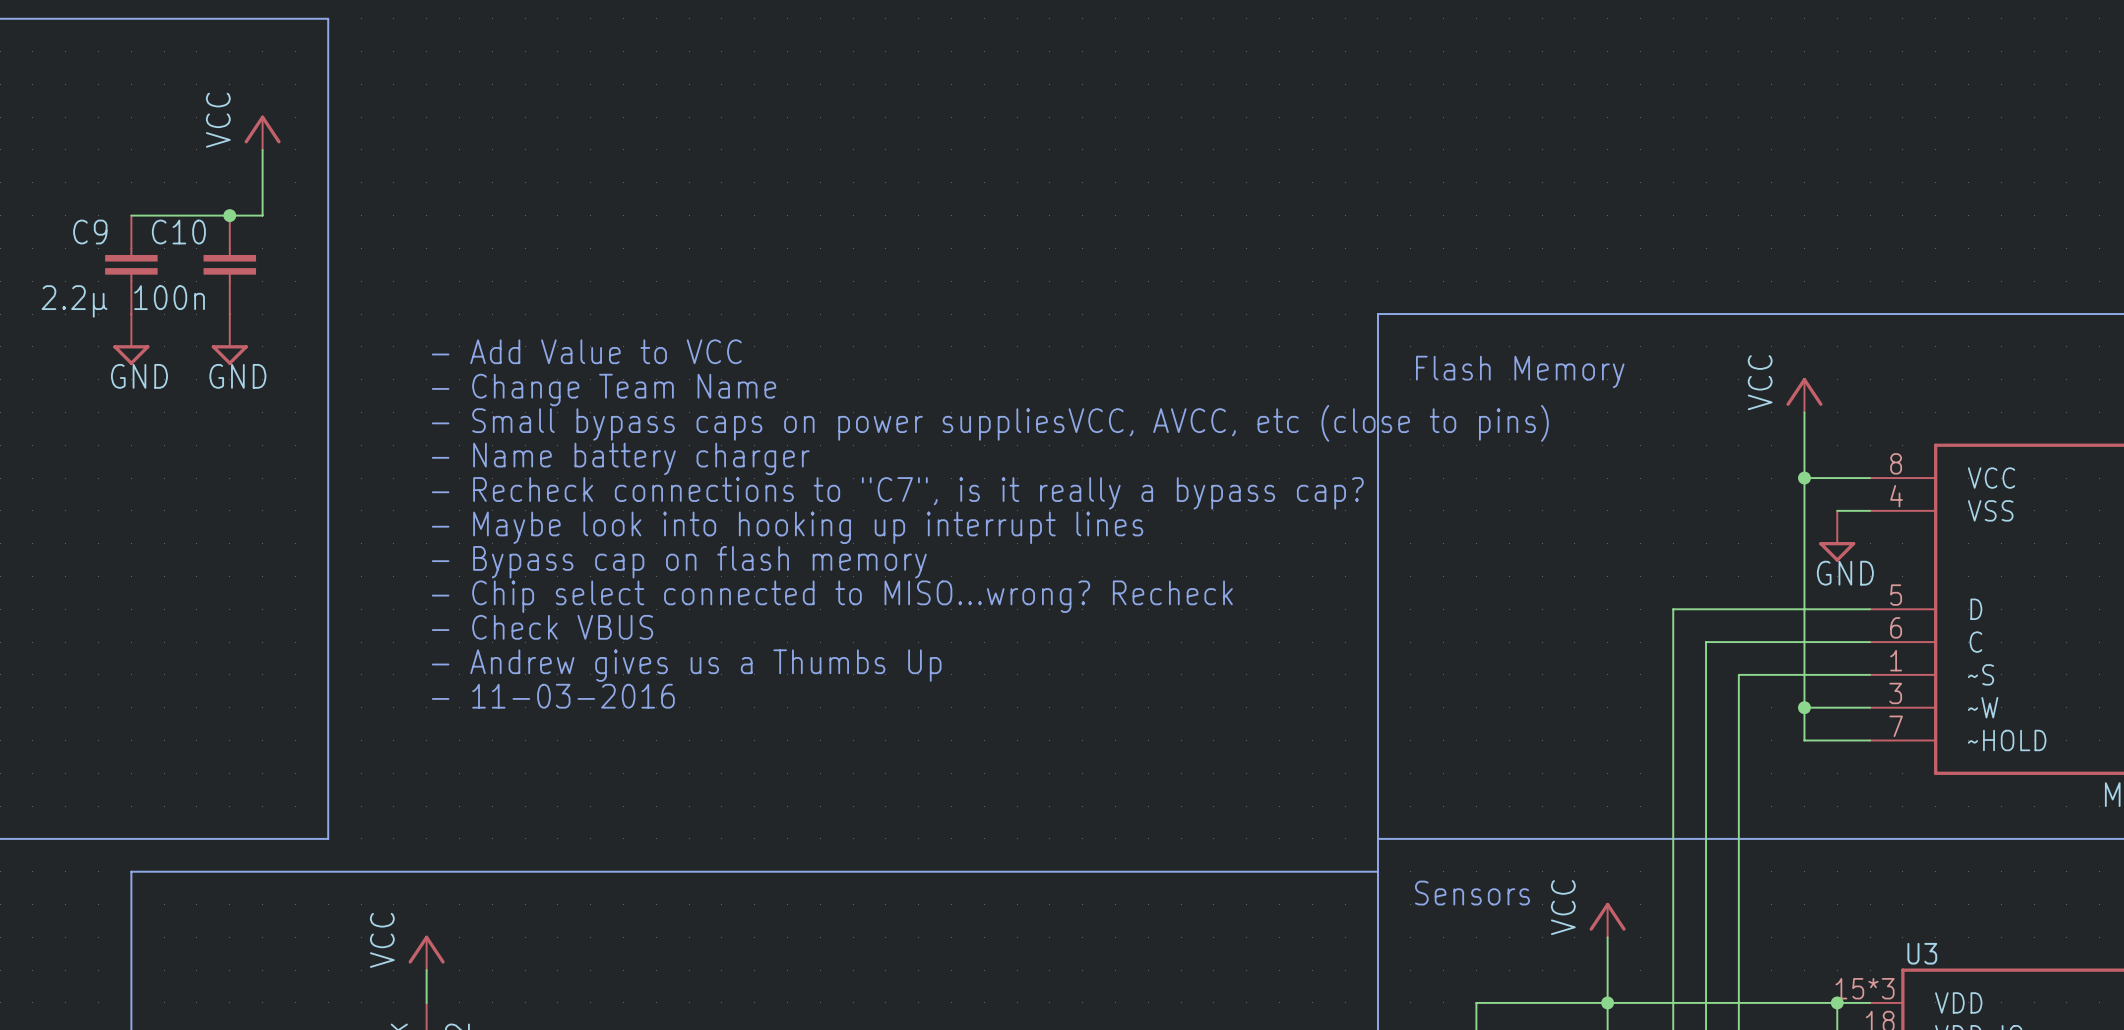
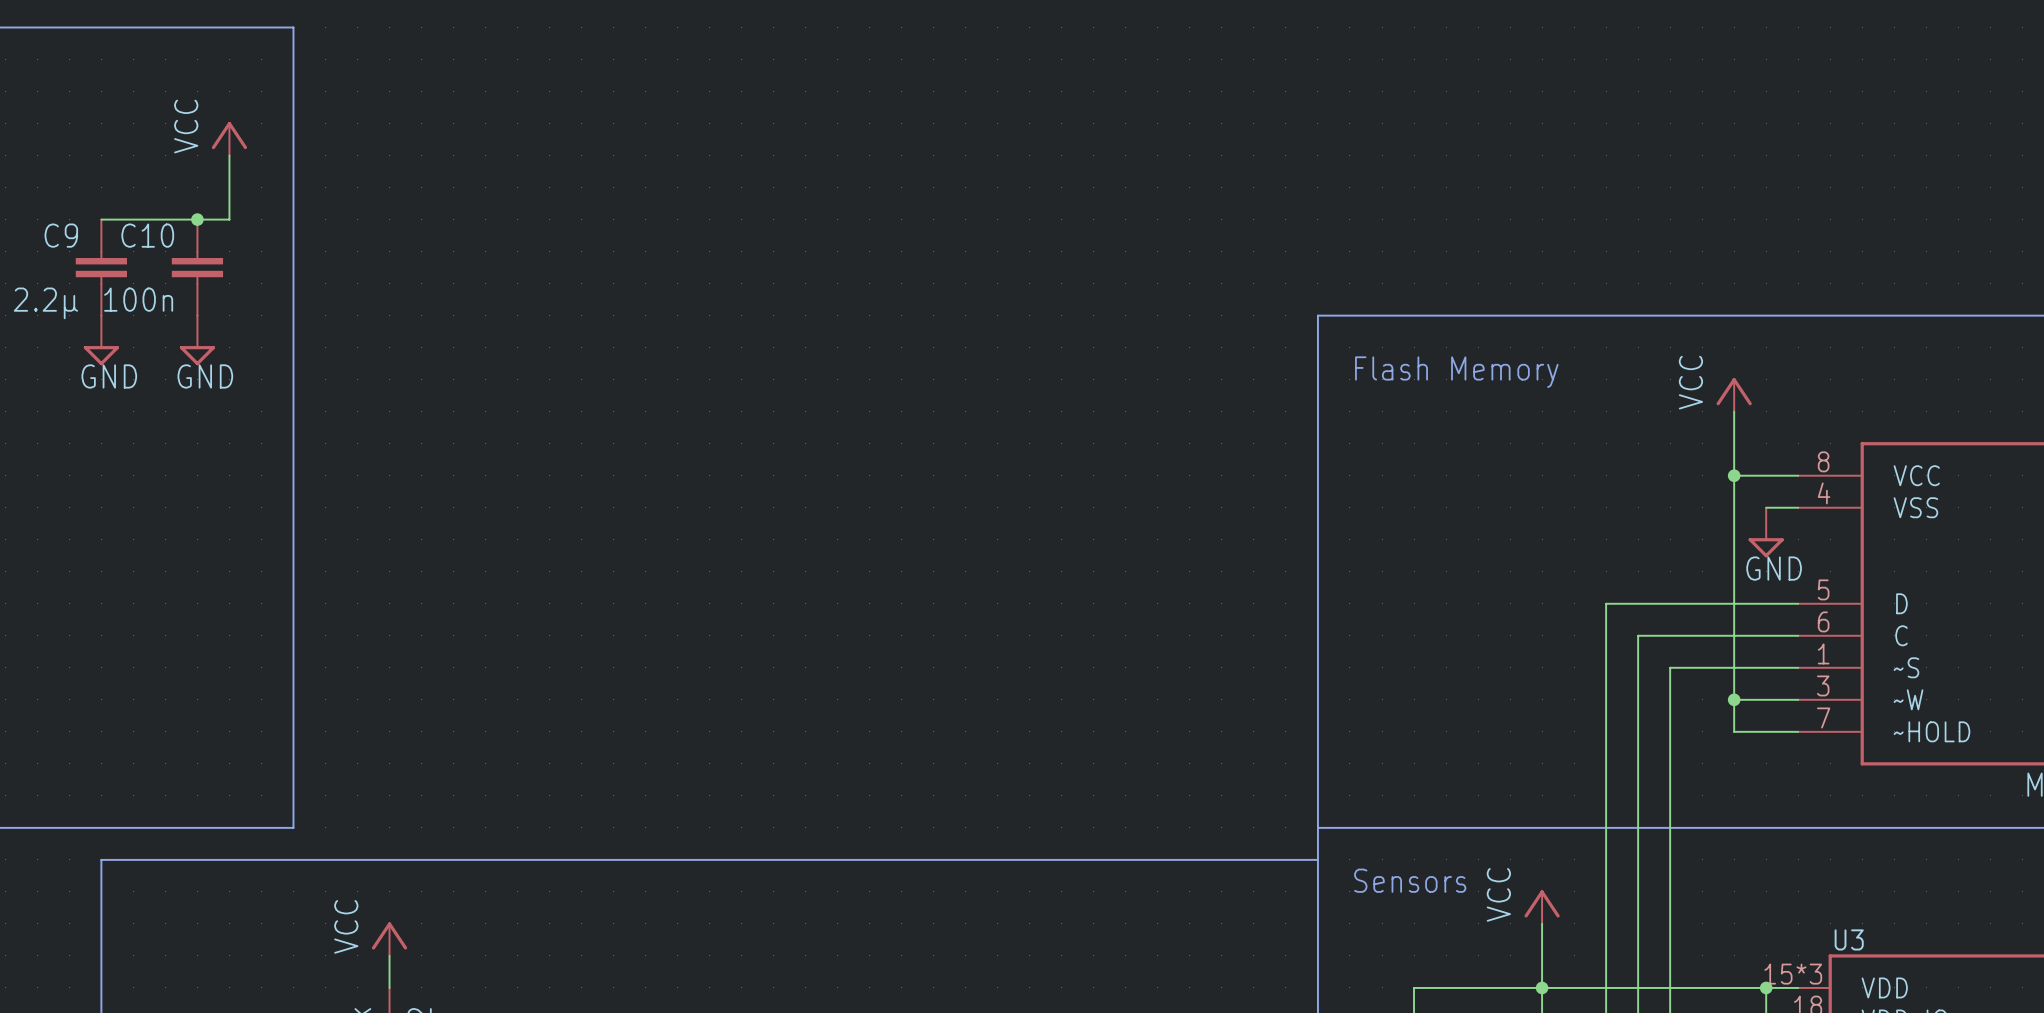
text: - Add Value to VCC (586, 351) -> none
text: - Change Team Name (604, 390) -> none
text: - Small bypass caps on power suppliesVCC, AVCC, etc (close to pins) (990, 423) -> none
text: - Name battery charger (620, 458) -> none
text: - Recheck connections to "C7", is it really a bypass cap? (897, 493) -> none
text: - Maybe look into hooking up interrupt lines (787, 527) -> none
text: - Bypass cap on flash memory (679, 562) -> none
text: - Chip select connected to MISO...wrong? Recheck (832, 596) -> none
text: - Check VBUS (542, 627) -> none
text: - Andrew gives us a Thumbs Up (686, 665) -> none
text: - 11-03-2016 (553, 696) -> none

